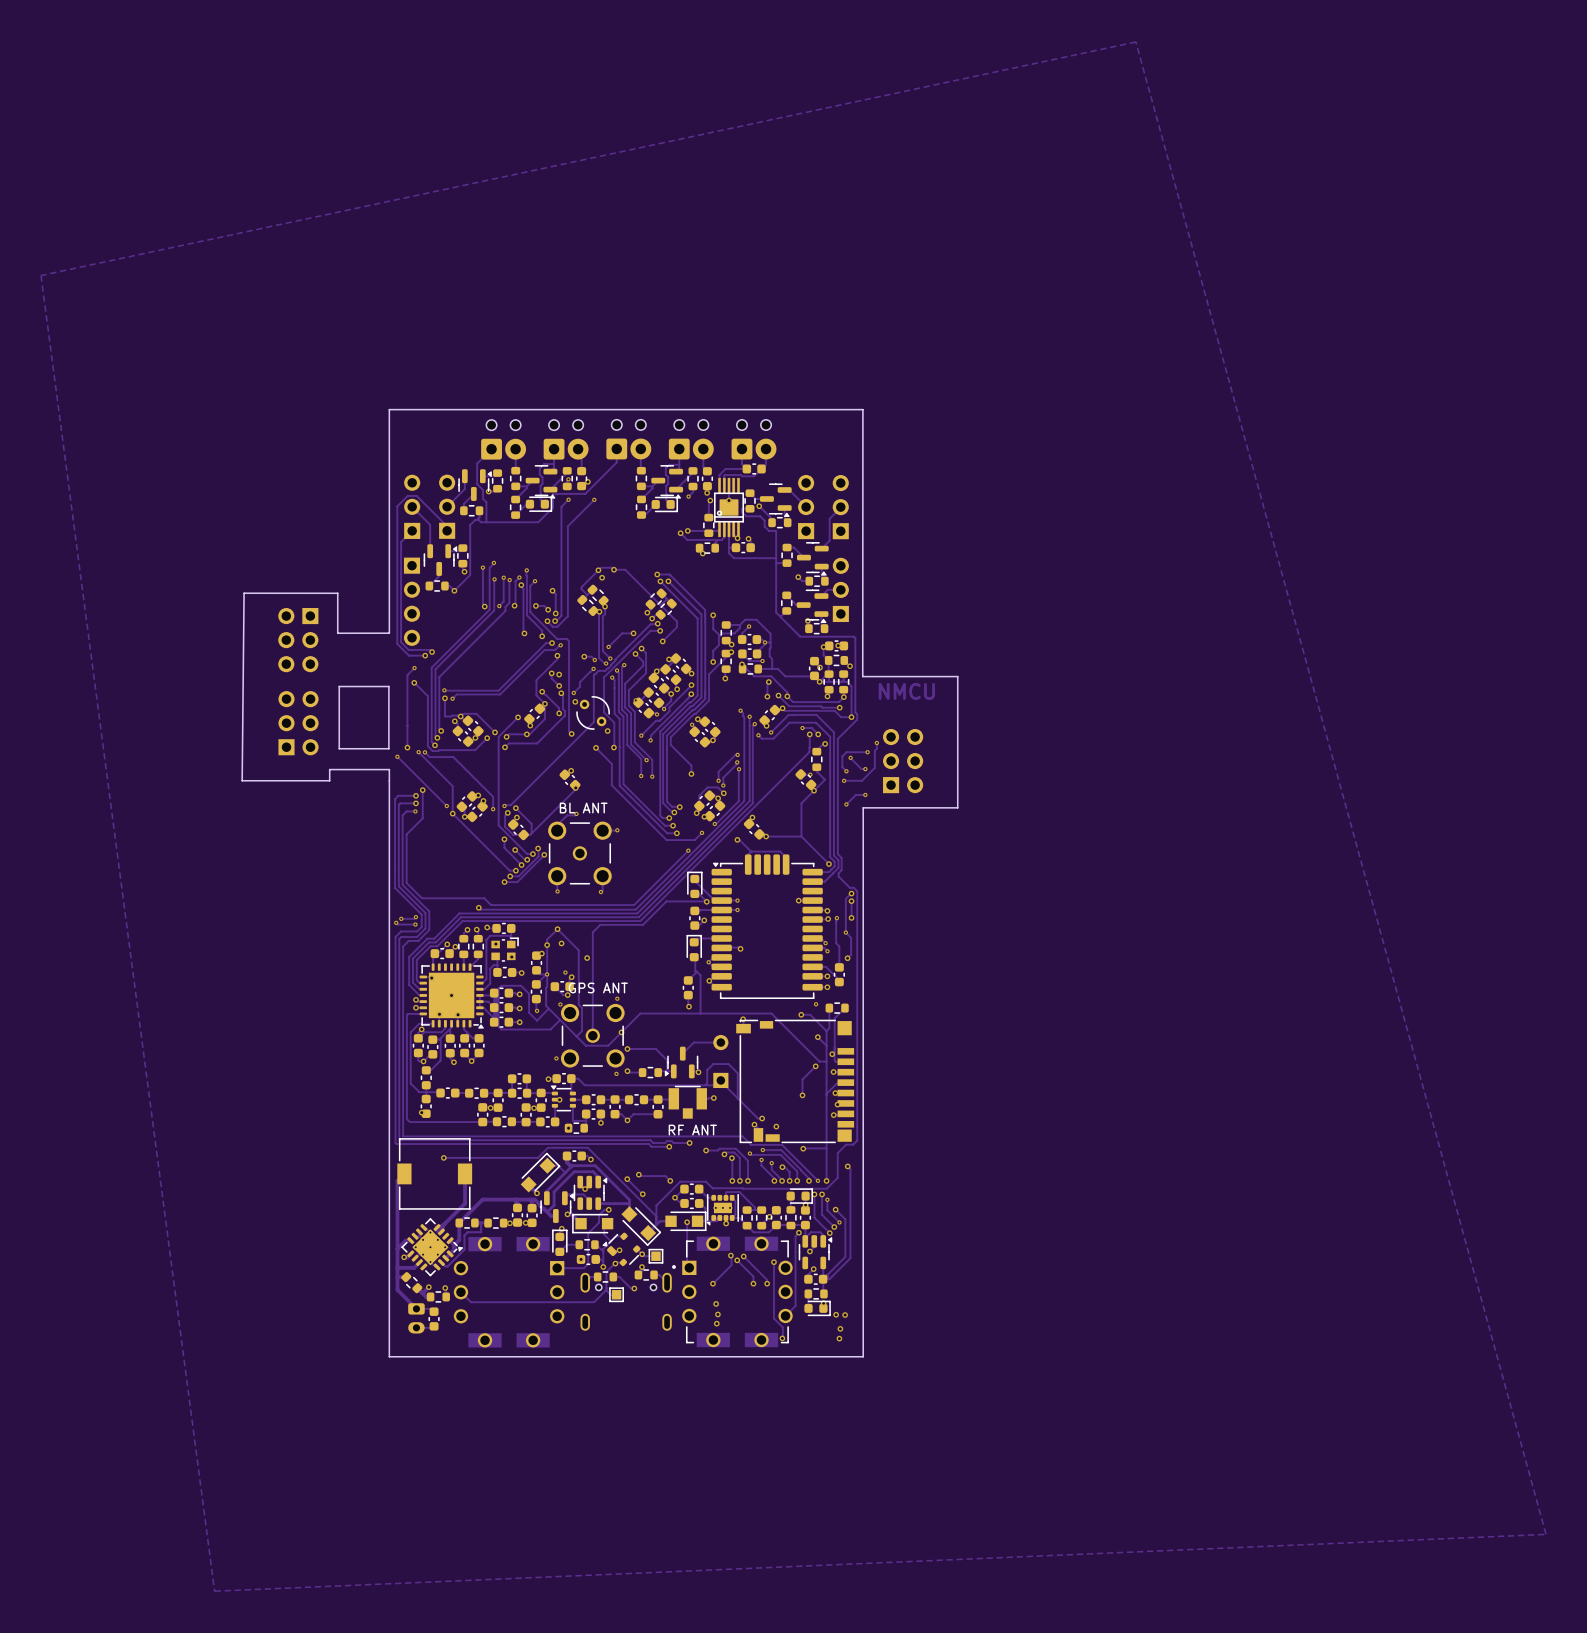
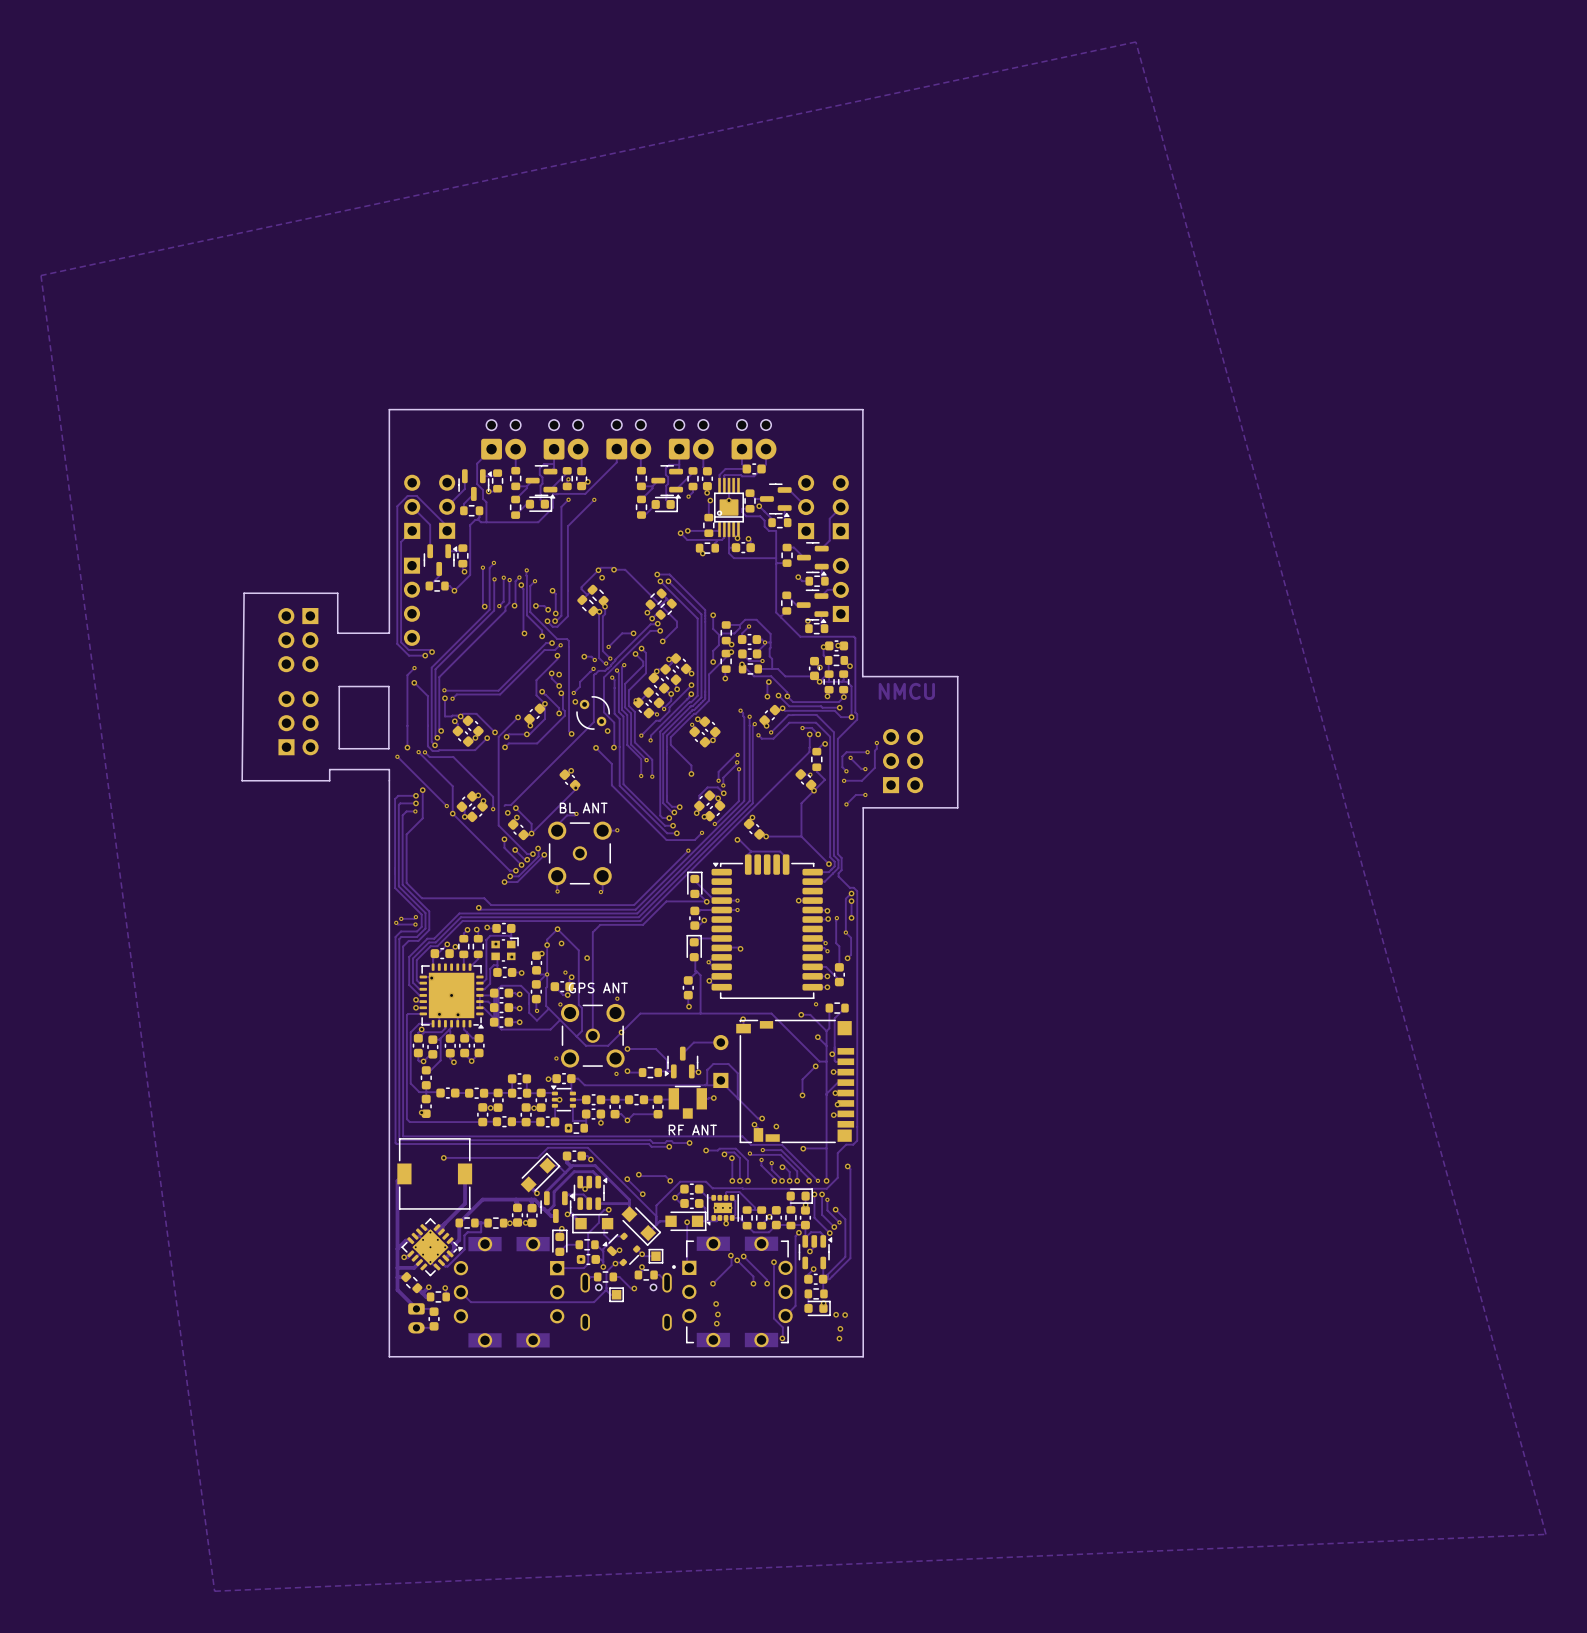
via: (504, 805) -> none
track: (507, 812) (505, 815) (505, 826) (513, 834) (523, 834) -> none
via: none -> (531, 833)

